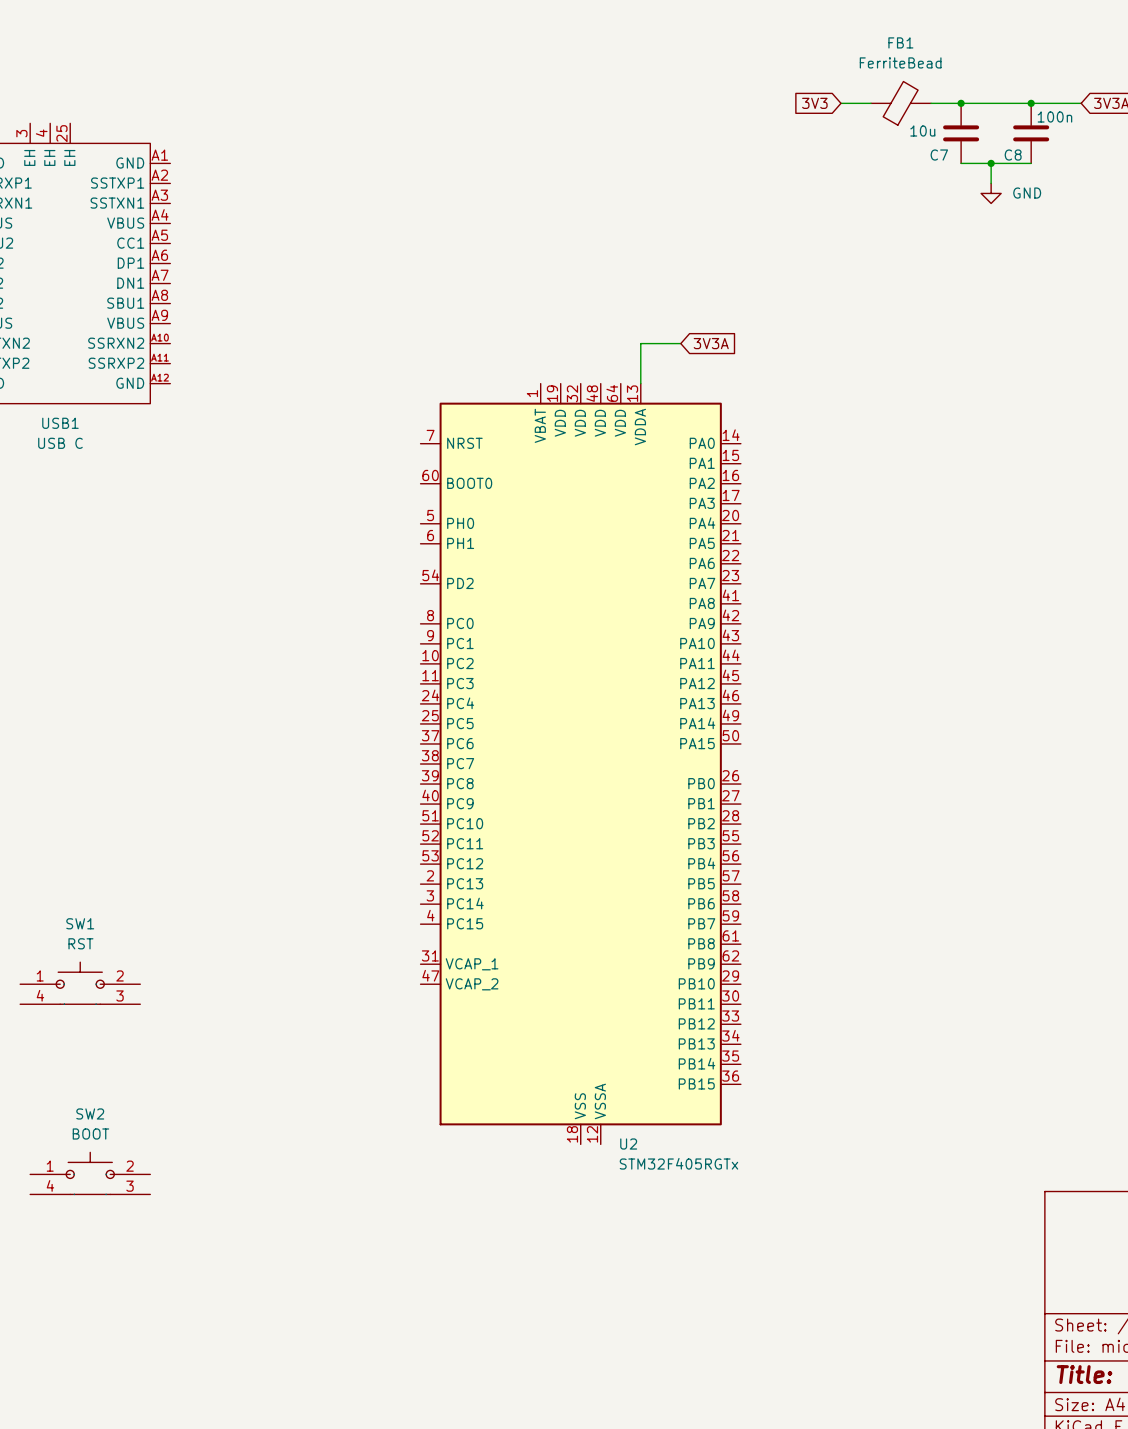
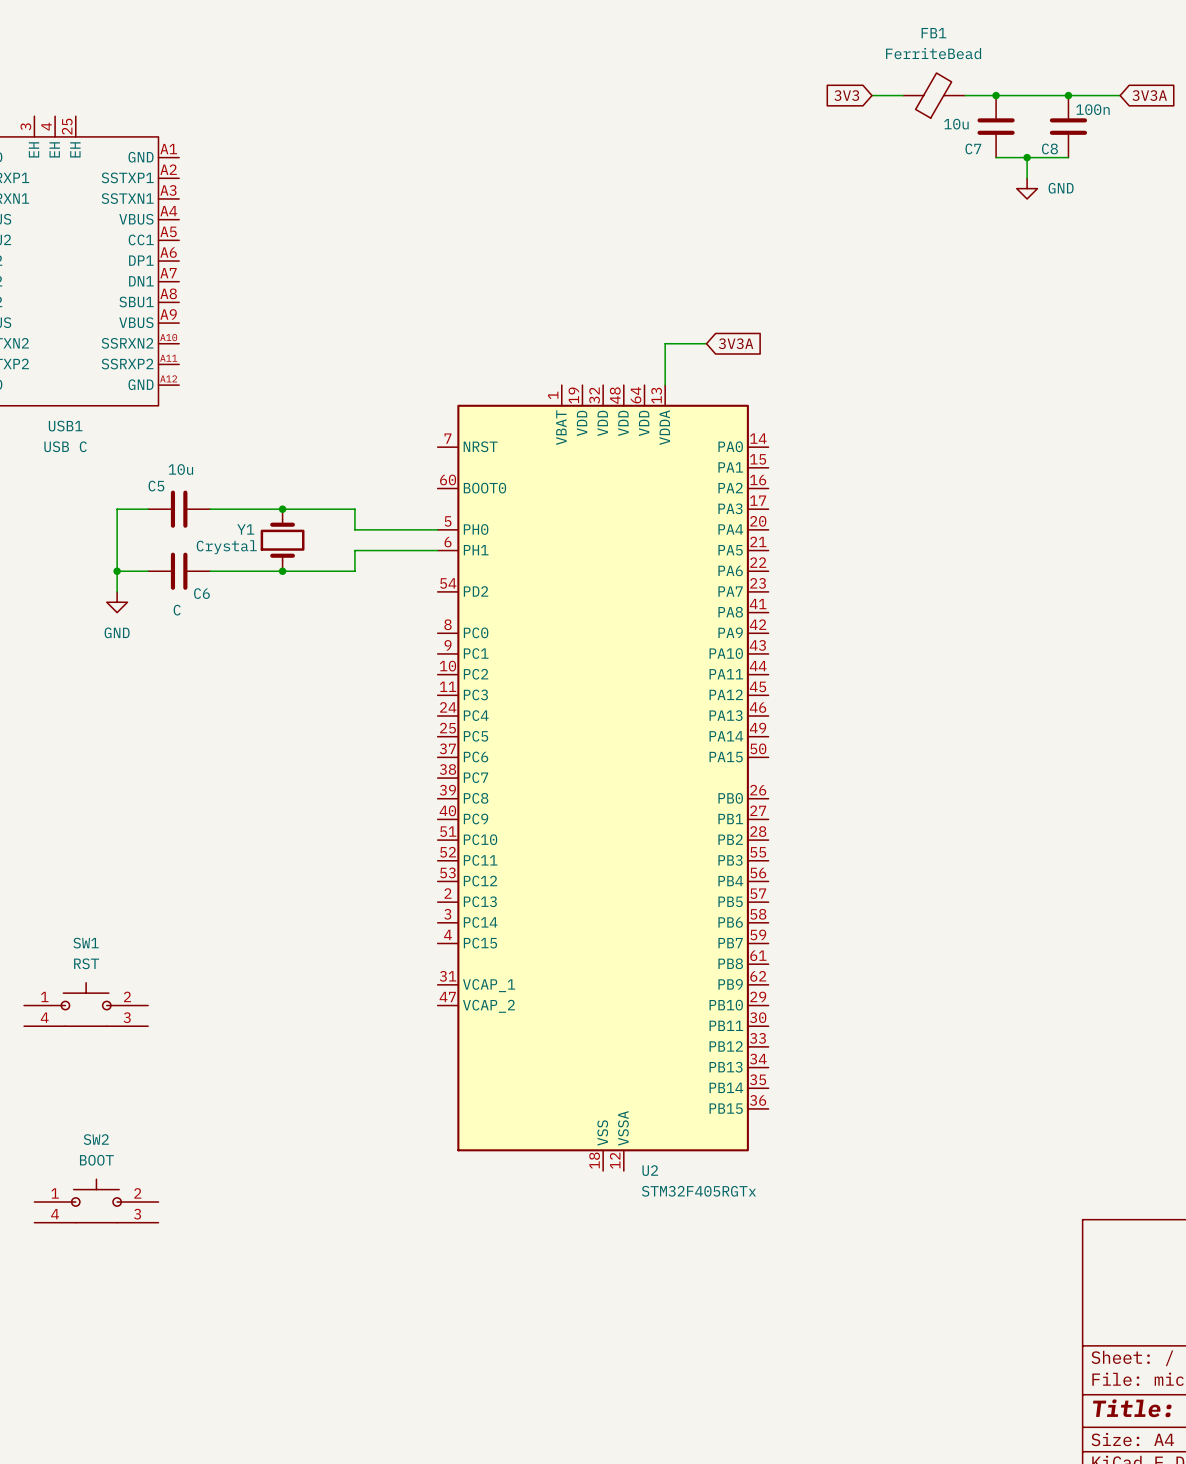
wire: none -> (148, 509) (117, 509) (117, 591)
C5: none -> 10u (179, 509)
wire: none -> (210, 509) (354, 509) (354, 529) (437, 529)
junction: none -> (282, 509)
Y1: none -> Crystal (282, 540)
wire: none -> (437, 550) (354, 550) (354, 571) (210, 571)
wire: none -> (117, 571) (148, 571)
junction: none -> (117, 571)
C6: none -> C (179, 571)
junction: none -> (282, 571)
power symbol: none -> GND (117, 602)

